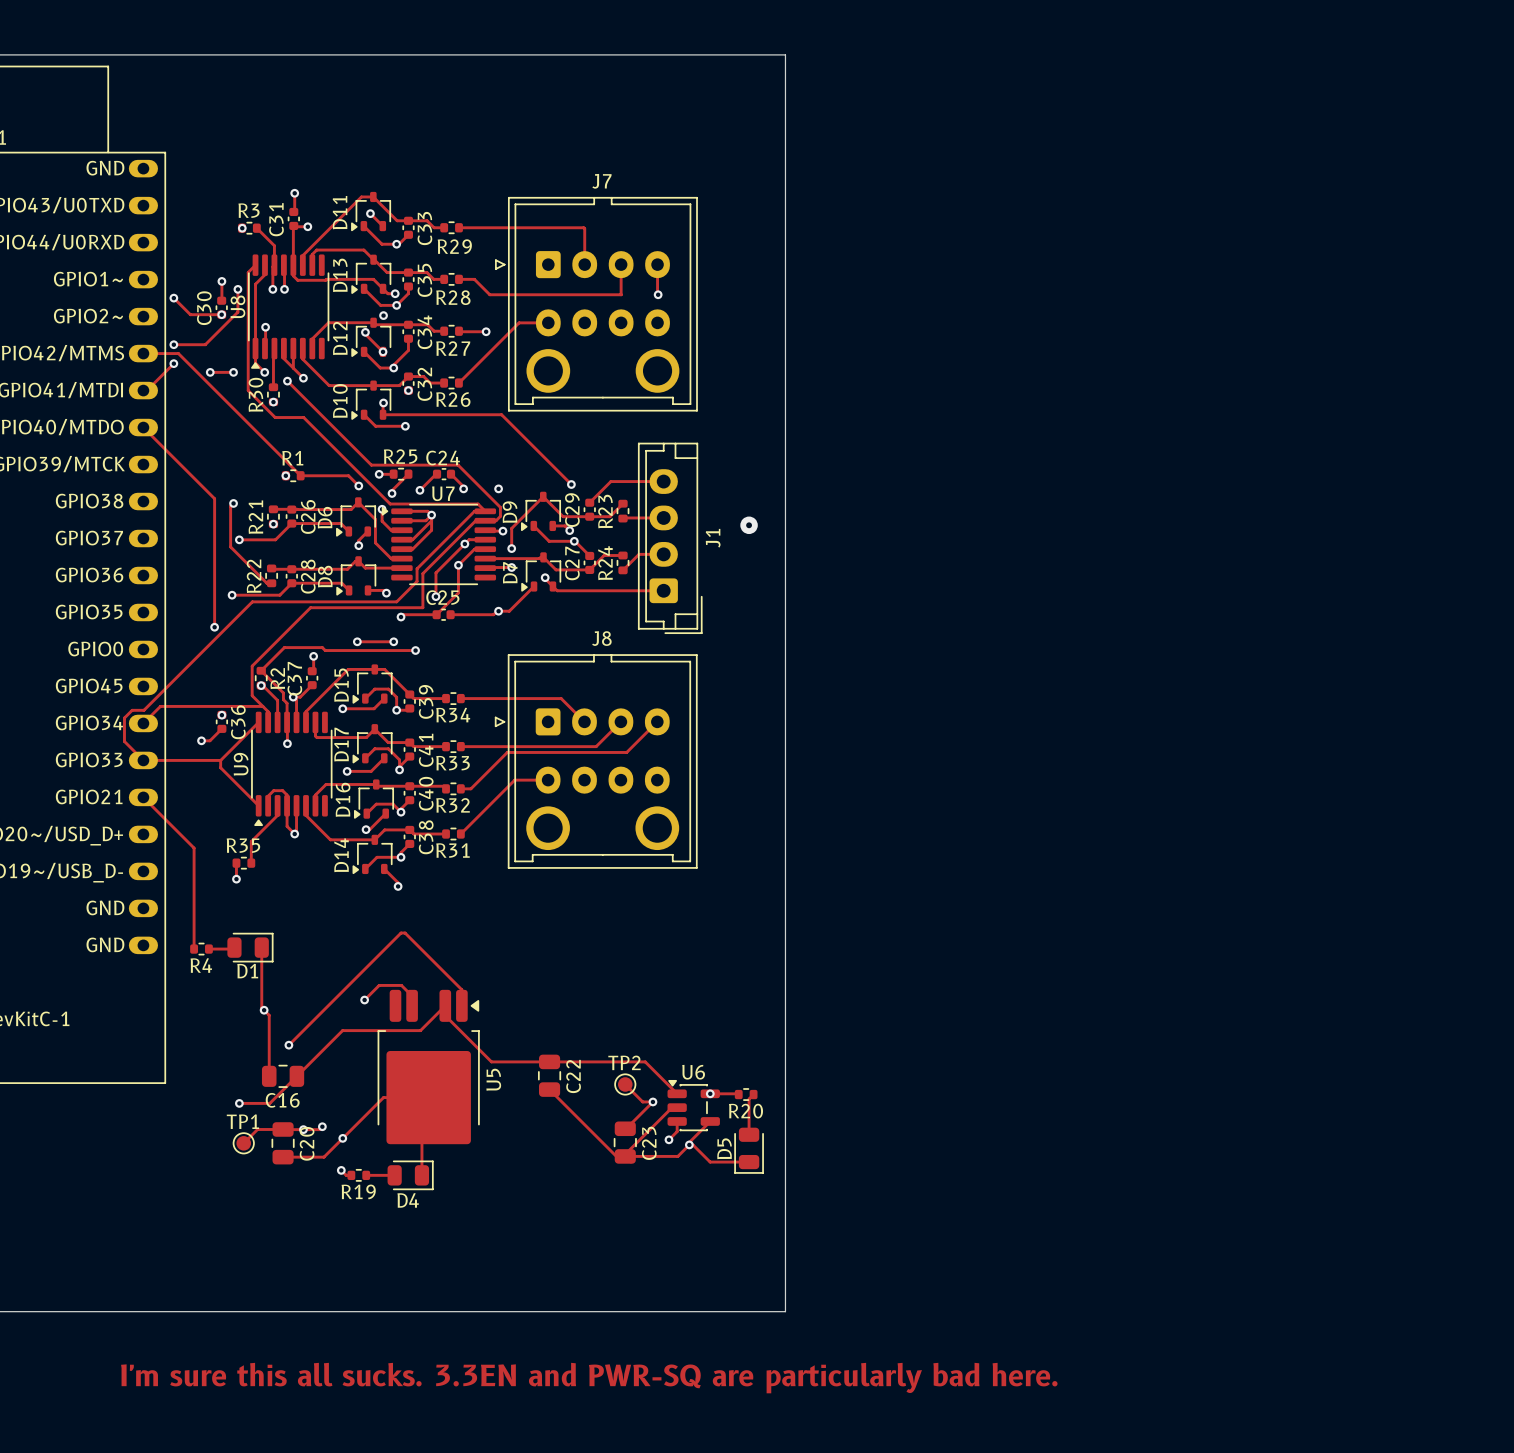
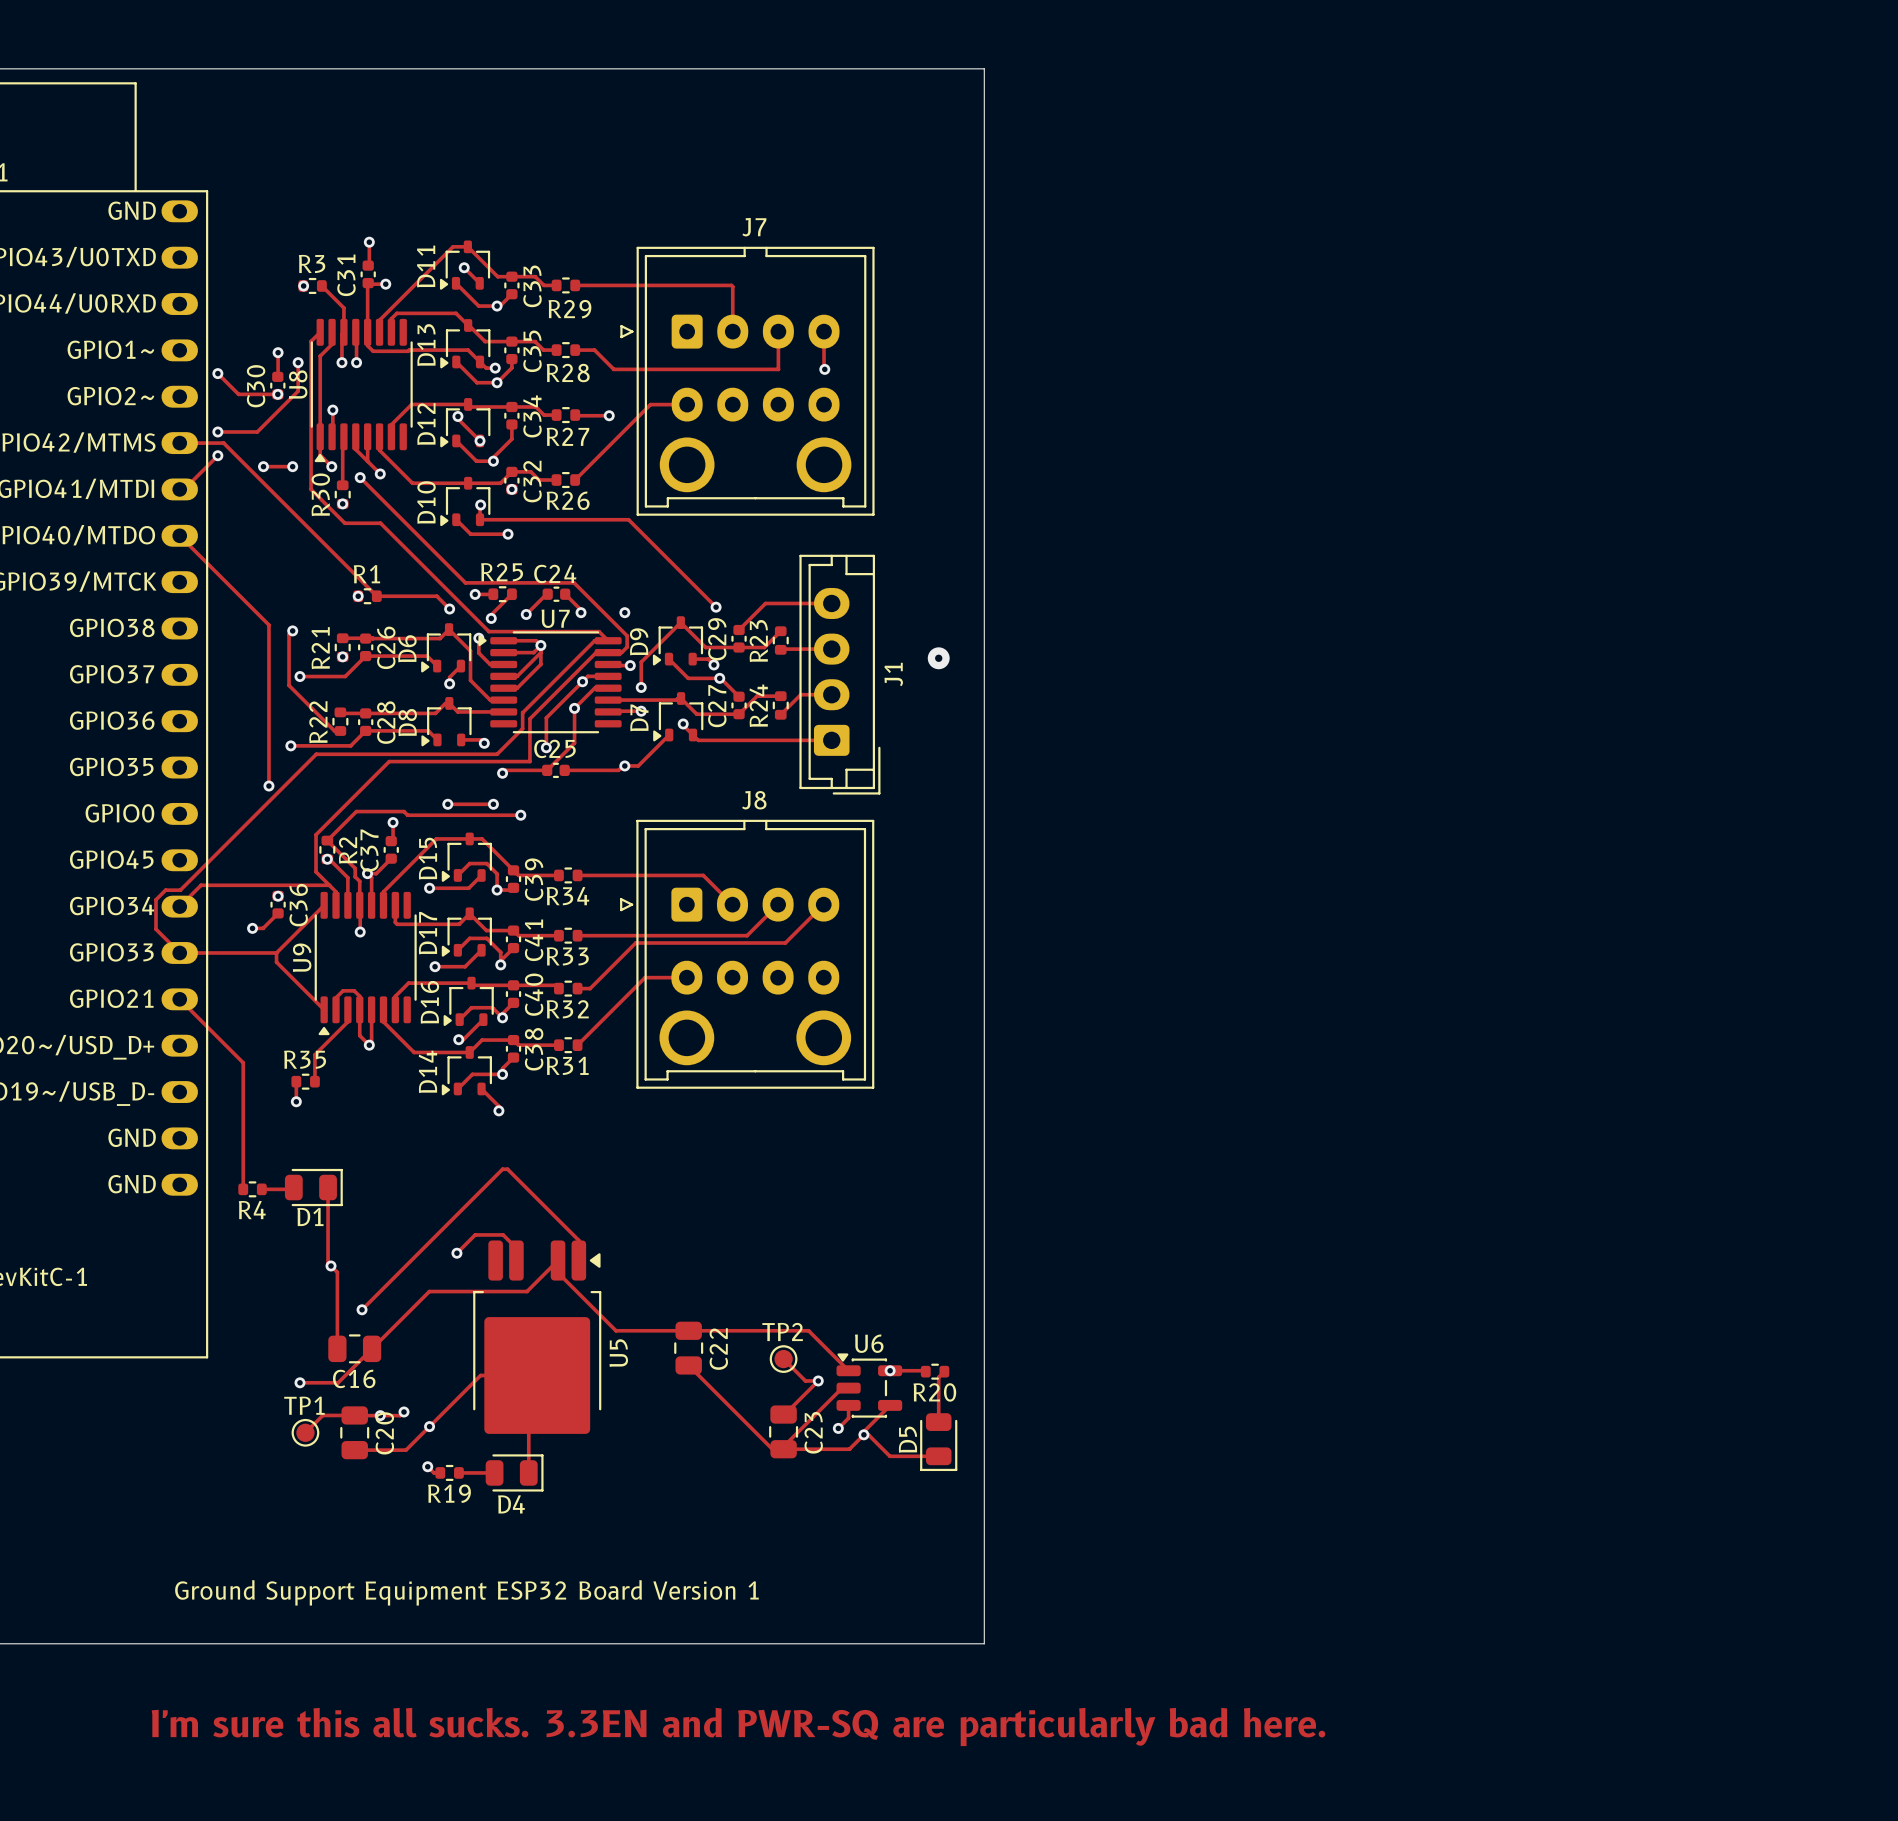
via: (383, 315) -> none
text: none -> Ground Support Equipment ESP32 Board Version 1 (466, 1592)

